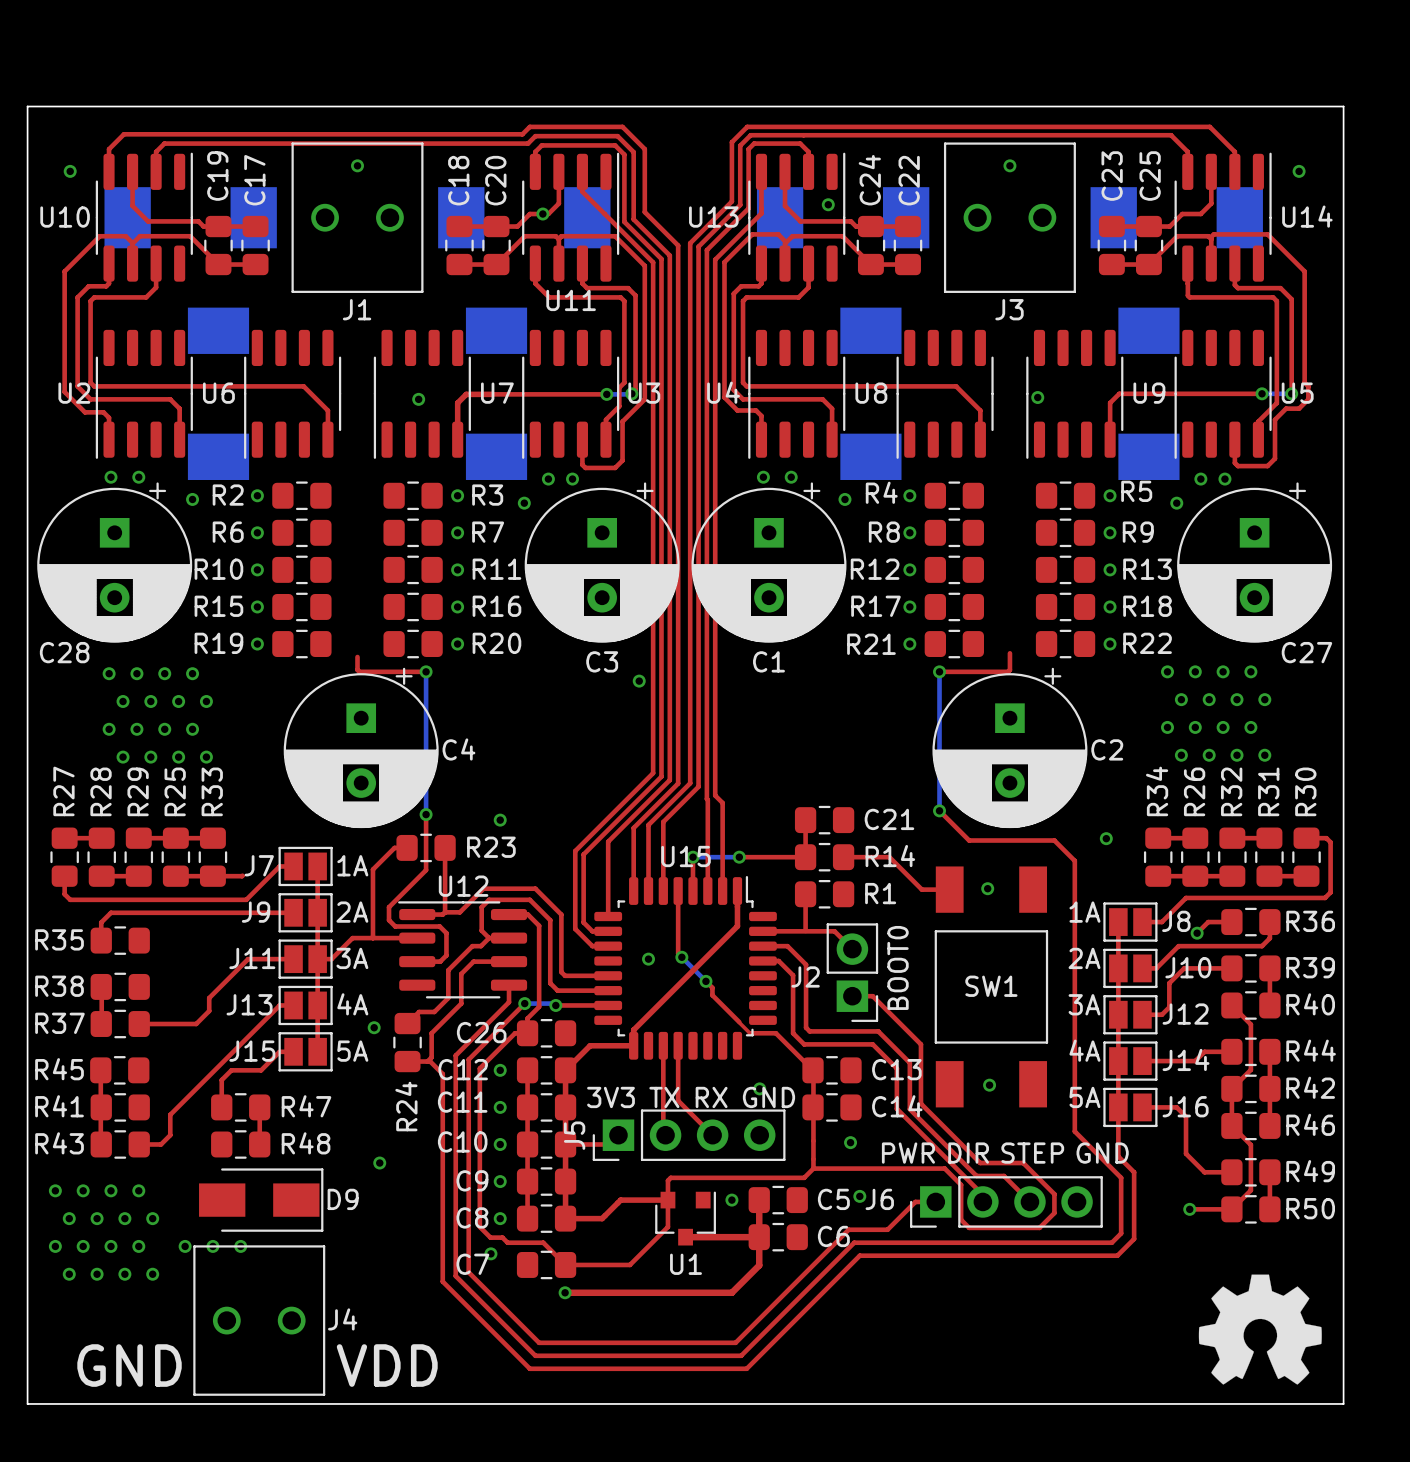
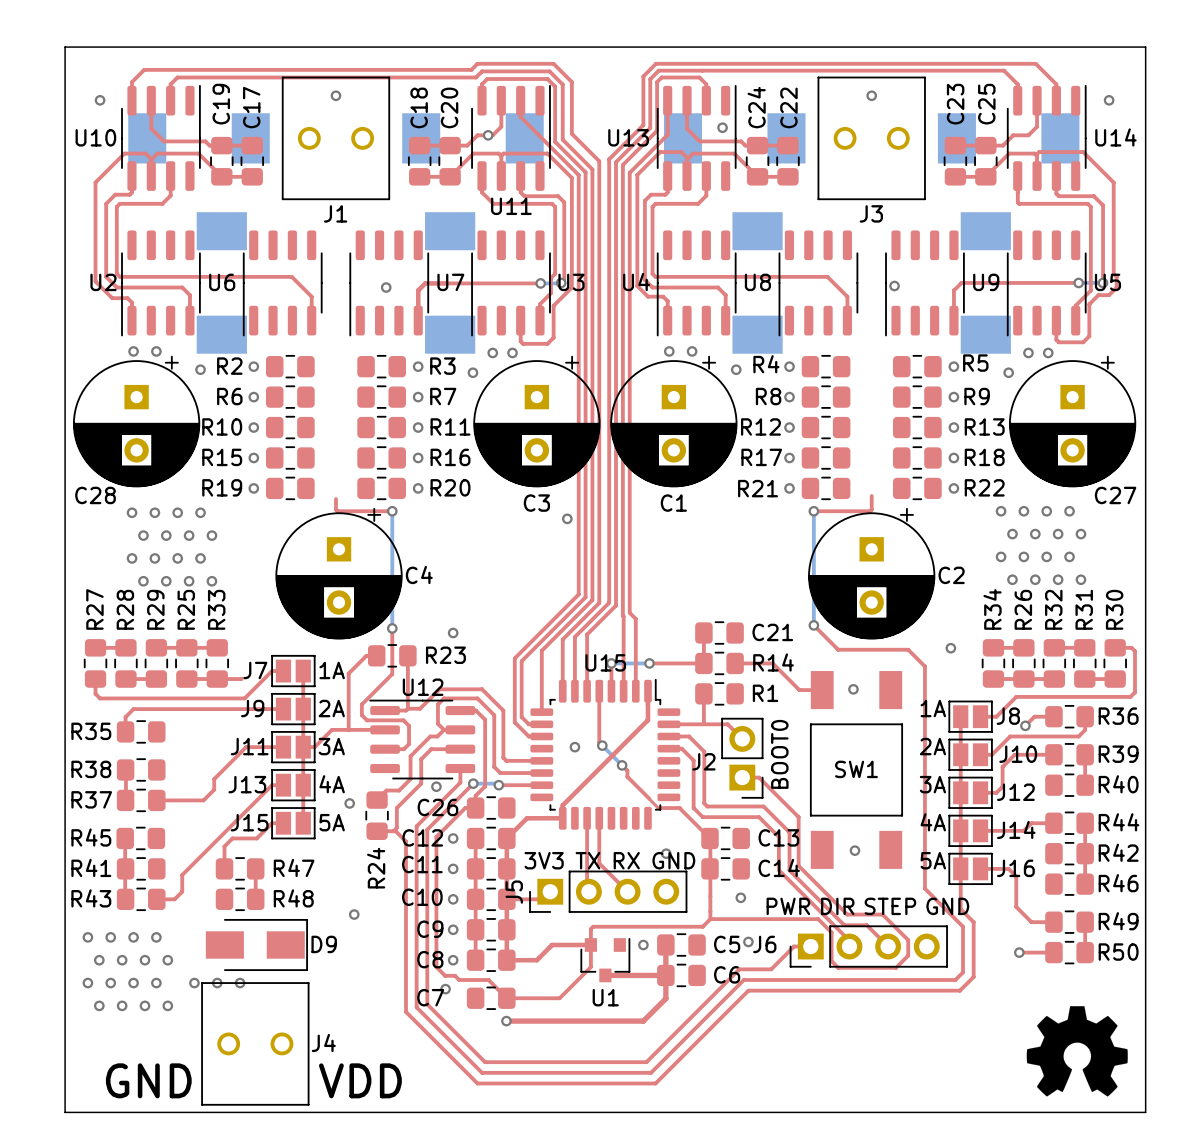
top track: (1231, 1005) (1250, 1024) (1250, 1069) (1231, 1088) (1231, 1125) (1250, 1144) (1250, 1190) (1231, 1209) -> none
via: none -> (436, 786)

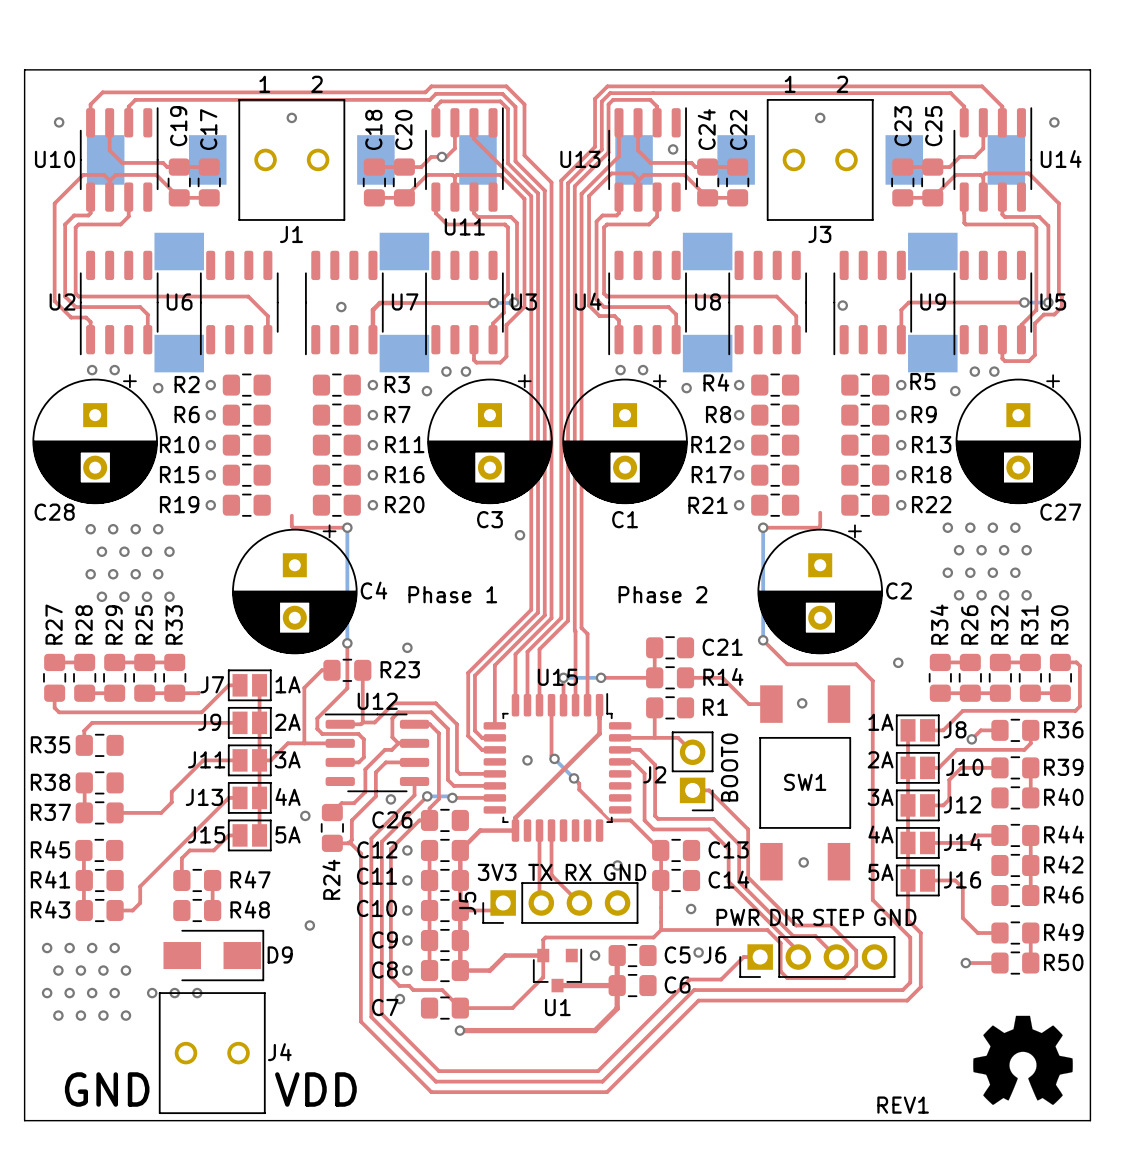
text: none -> 1 (264, 84)
text: none -> 2 (316, 84)
text: none -> 1 (790, 84)
text: none -> 2 (842, 84)
text: none -> Phase 1 (452, 594)
text: none -> Phase 2 (662, 594)
text: none -> REV1 (903, 1105)

